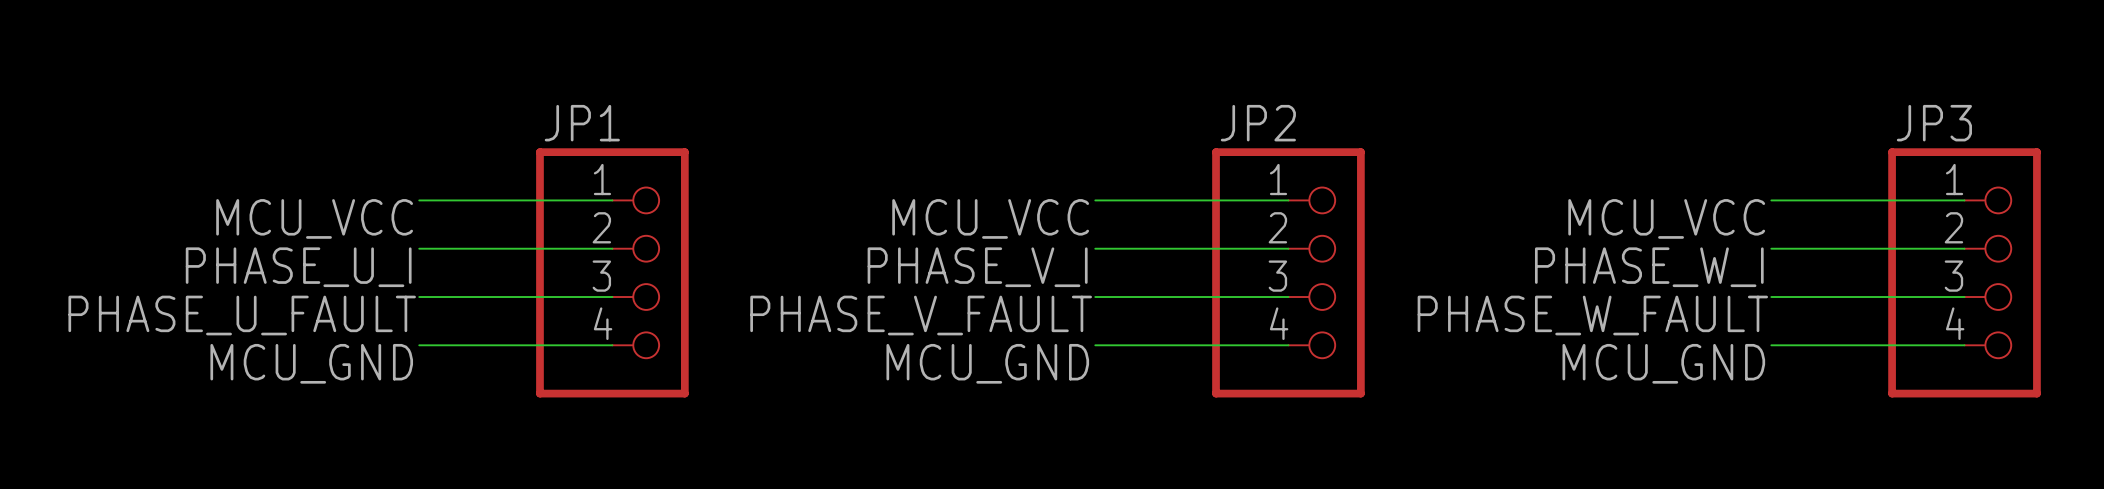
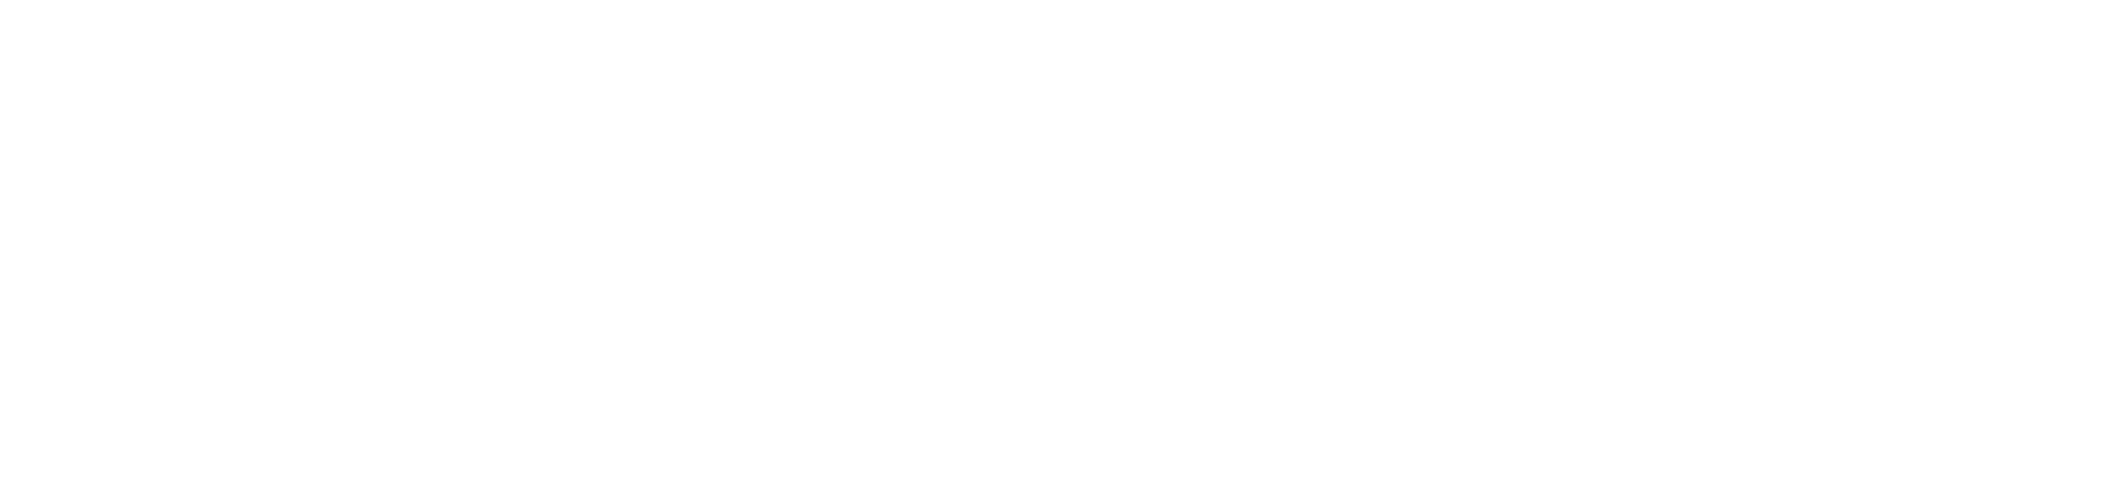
wire: (419, 200) (612, 200) -> none
wire: (1095, 200) (1288, 200) -> none
wire: (1771, 200) (1964, 200) -> none
label: MCU_VCC (314, 218) -> none
label: MCU_VCC (990, 218) -> none
label: MCU_VCC (1666, 218) -> none
wire: (419, 248) (612, 248) -> none
wire: (1095, 248) (1288, 248) -> none
wire: (1771, 248) (1964, 248) -> none
label: PHASE_U_I (298, 267) -> none
label: PHASE_V_I (977, 267) -> none
label: PHASE_W_I (1649, 267) -> none
JP1: (612, 272) -> none
JP2: (1288, 272) -> none
JP3: (1964, 272) -> none
wire: (419, 297) (612, 297) -> none
wire: (1095, 297) (1288, 297) -> none
wire: (1771, 297) (1964, 297) -> none
label: PHASE_U_FAULT (242, 315) -> none
label: PHASE_V_FAULT (921, 315) -> none
label: PHASE_W_FAULT (1592, 315) -> none
wire: (419, 345) (612, 345) -> none
wire: (1095, 345) (1288, 345) -> none
wire: (1771, 345) (1964, 345) -> none
label: MCU_GND (311, 363) -> none
label: MCU_GND (987, 363) -> none
label: MCU_GND (1663, 363) -> none

